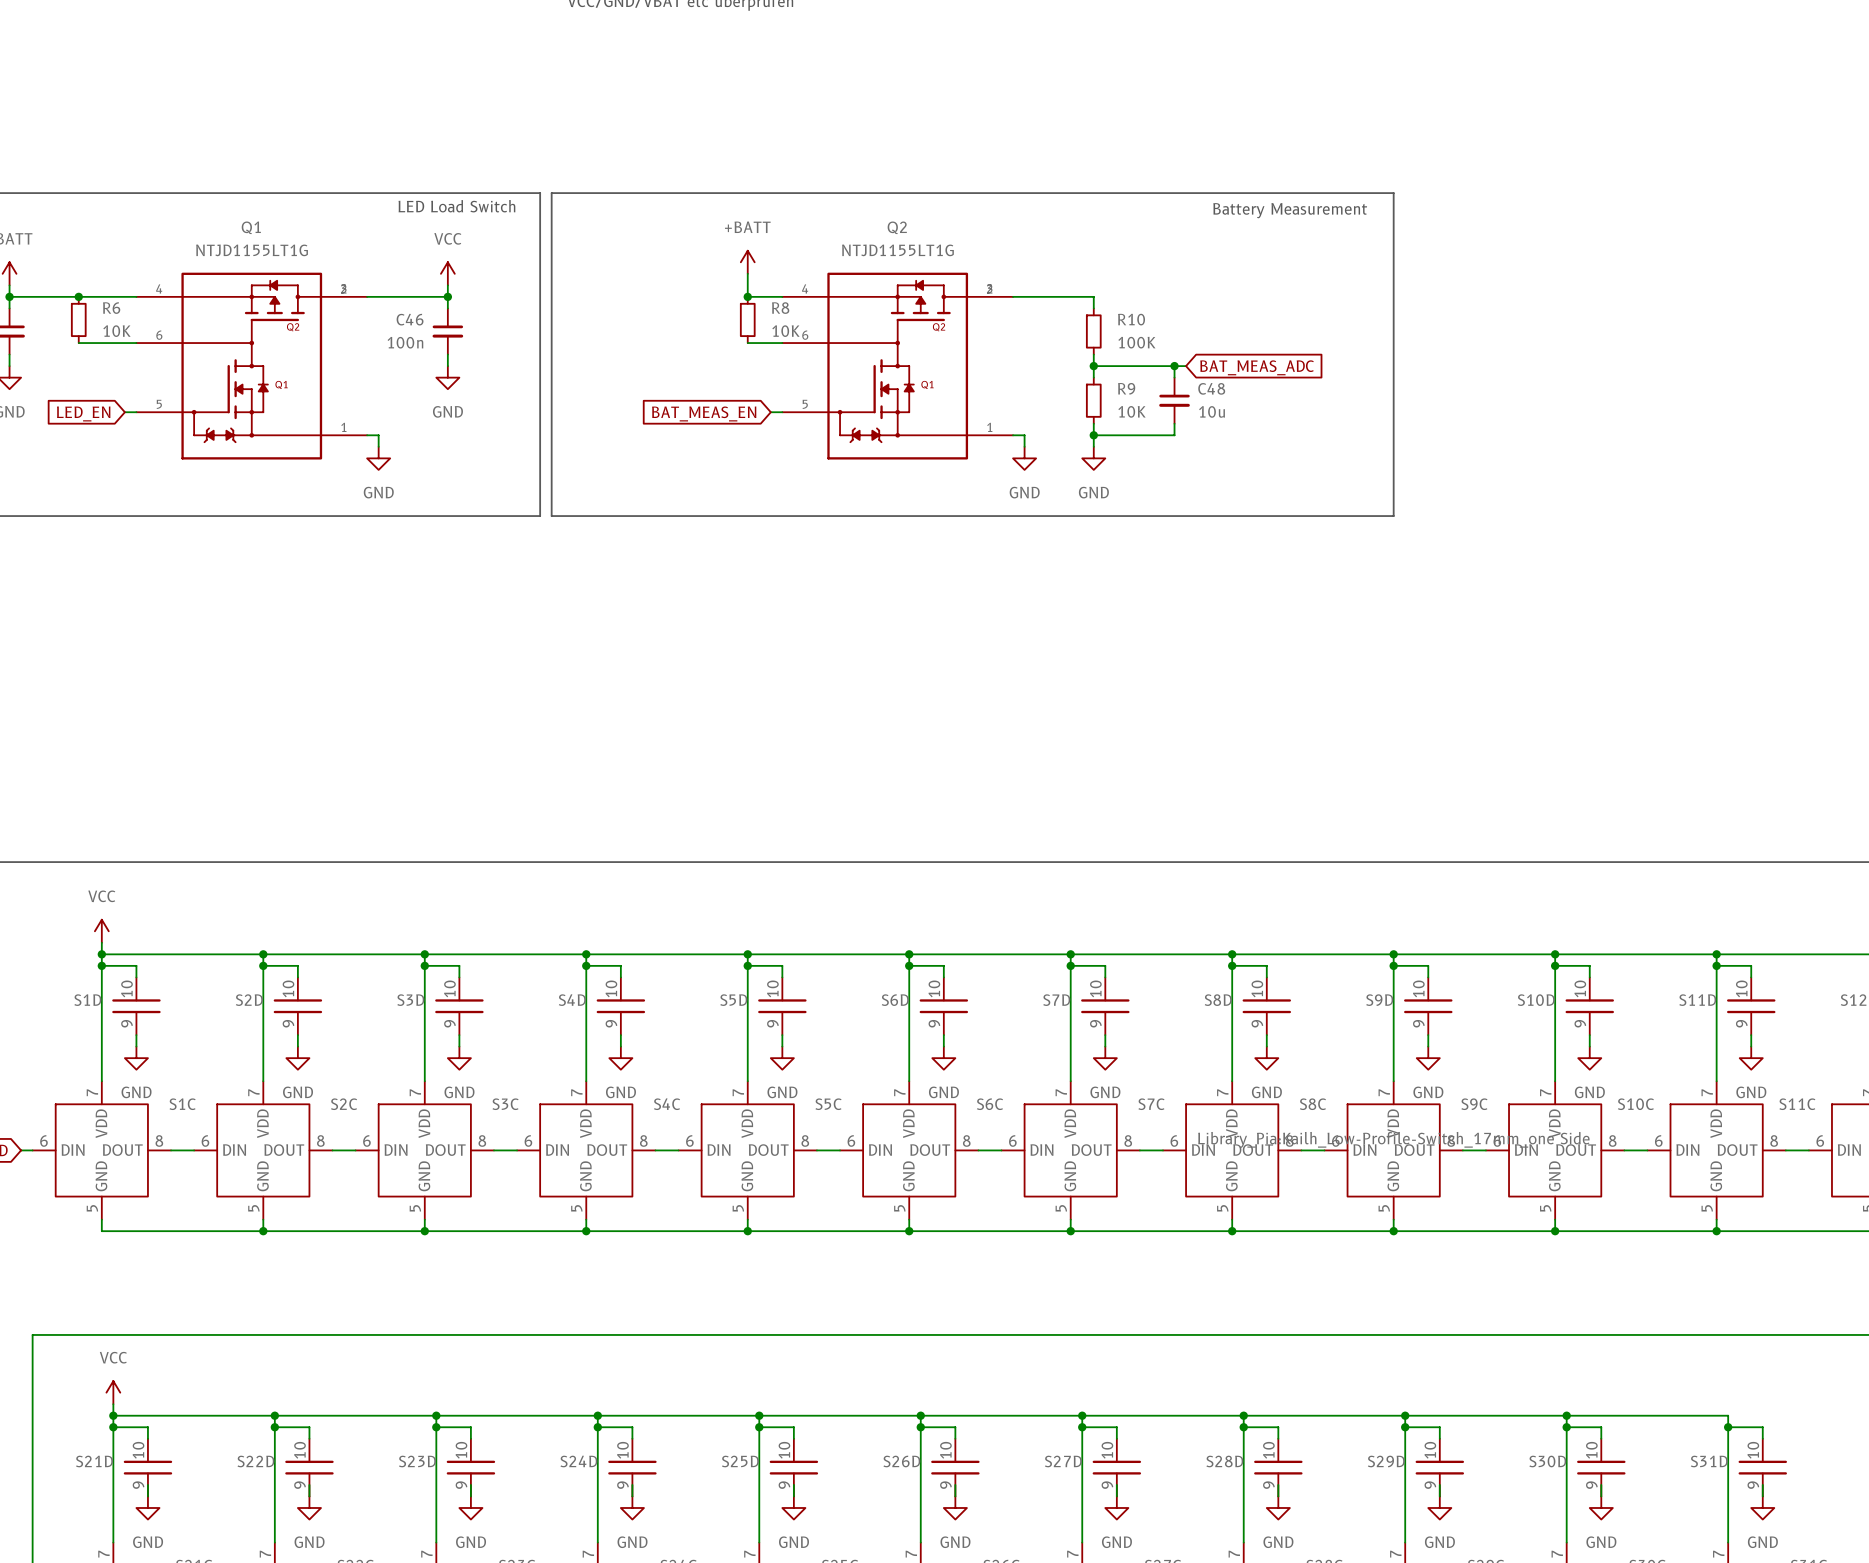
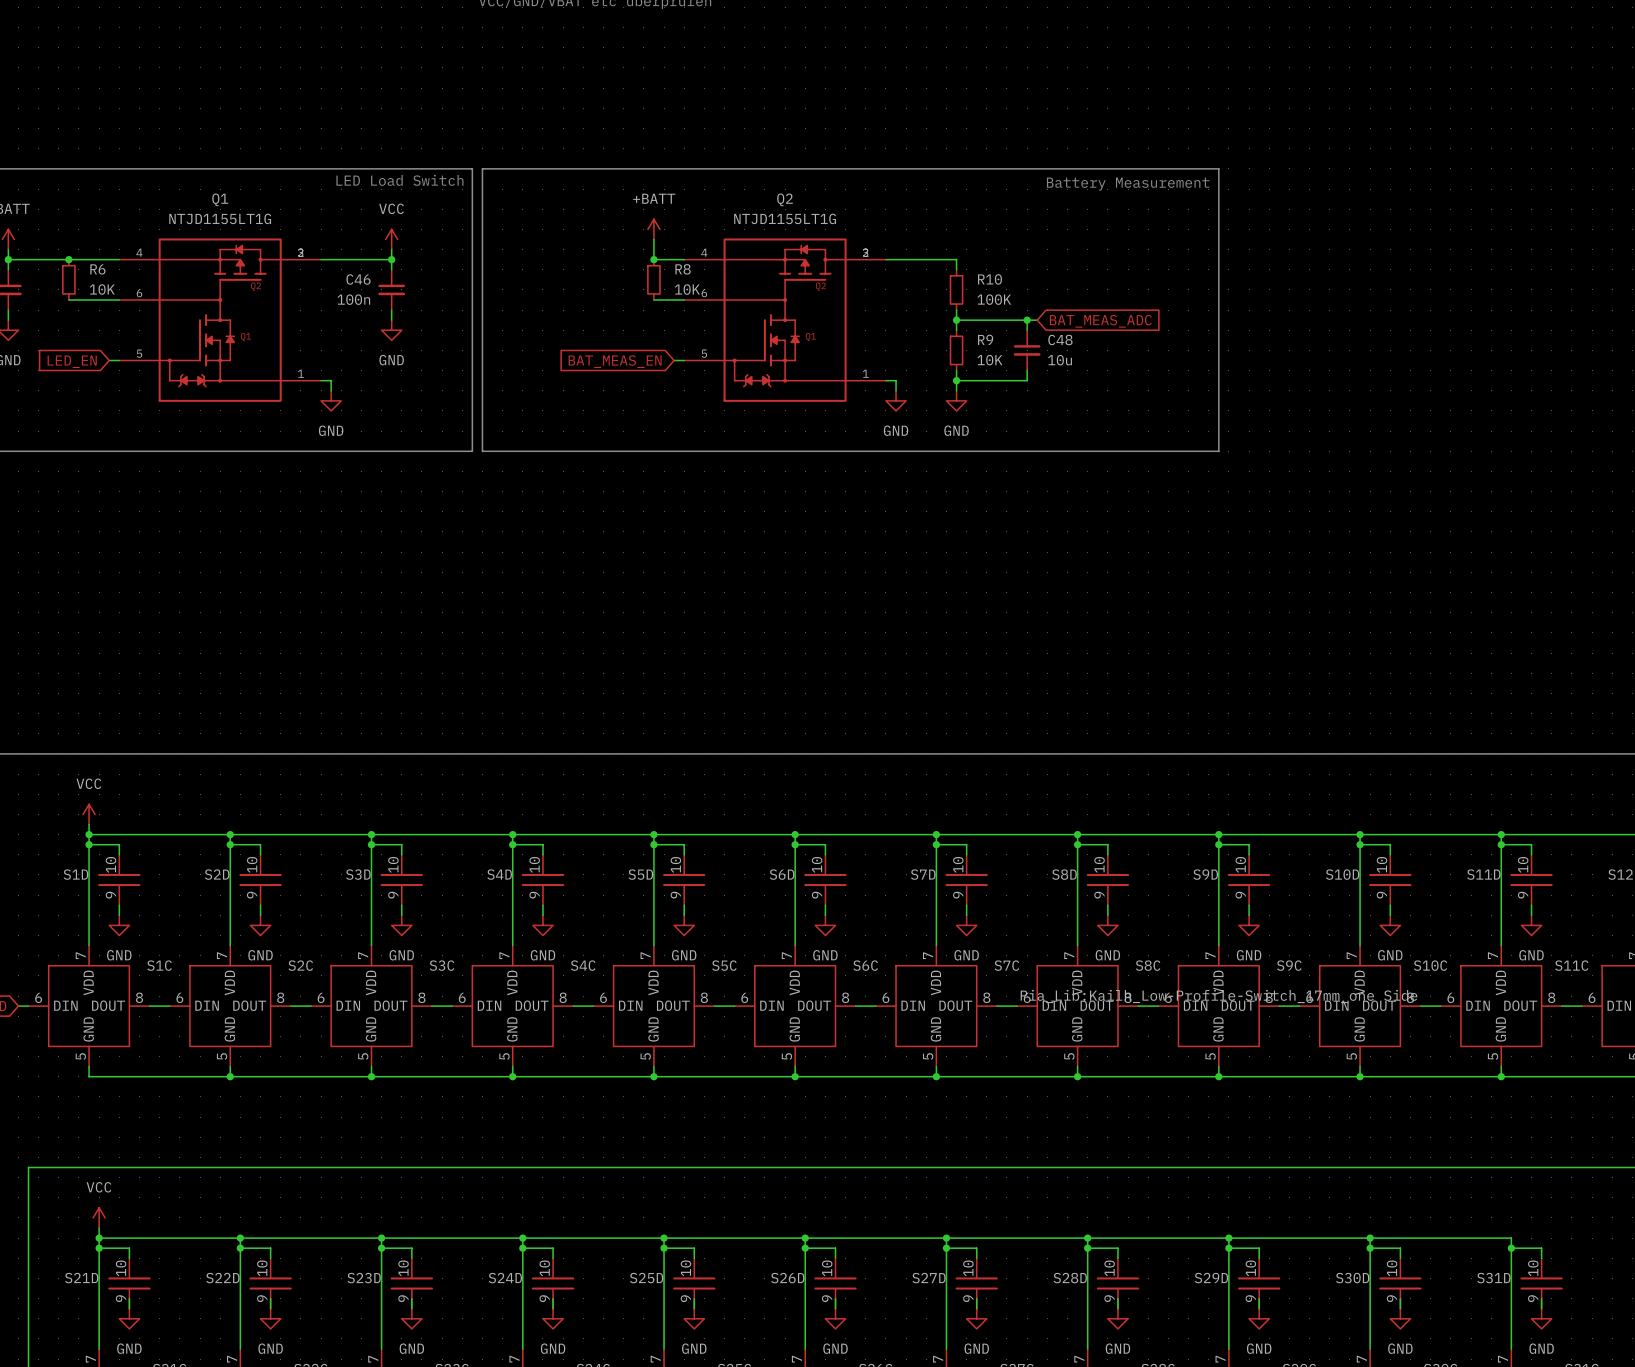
S8C text: Library_Pia:Kailh_Low-Profile-Switch_17mm_one Side (1393, 1139) -> Pia_Lib:Kailh_Low-Profile-Switch_17mm_one Side (1218, 996)

